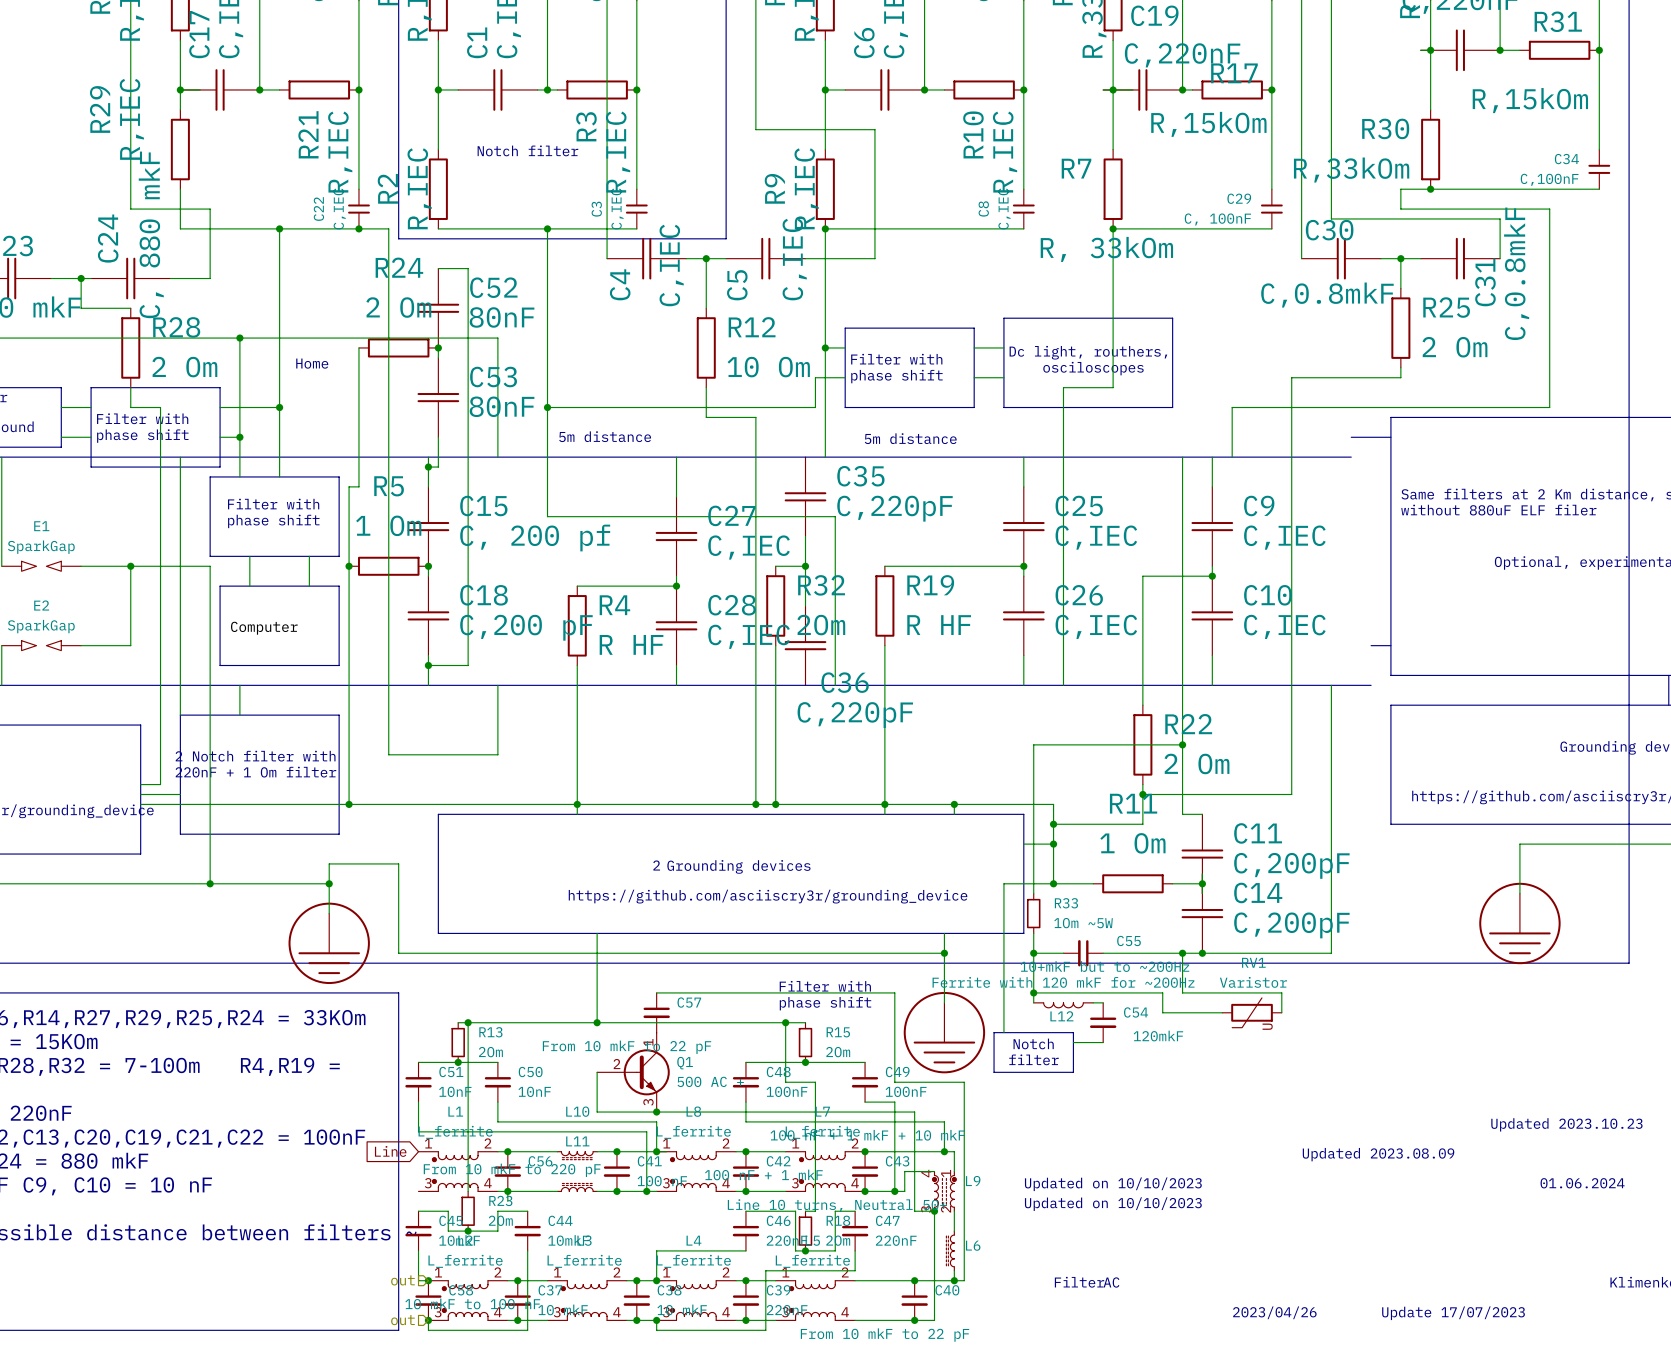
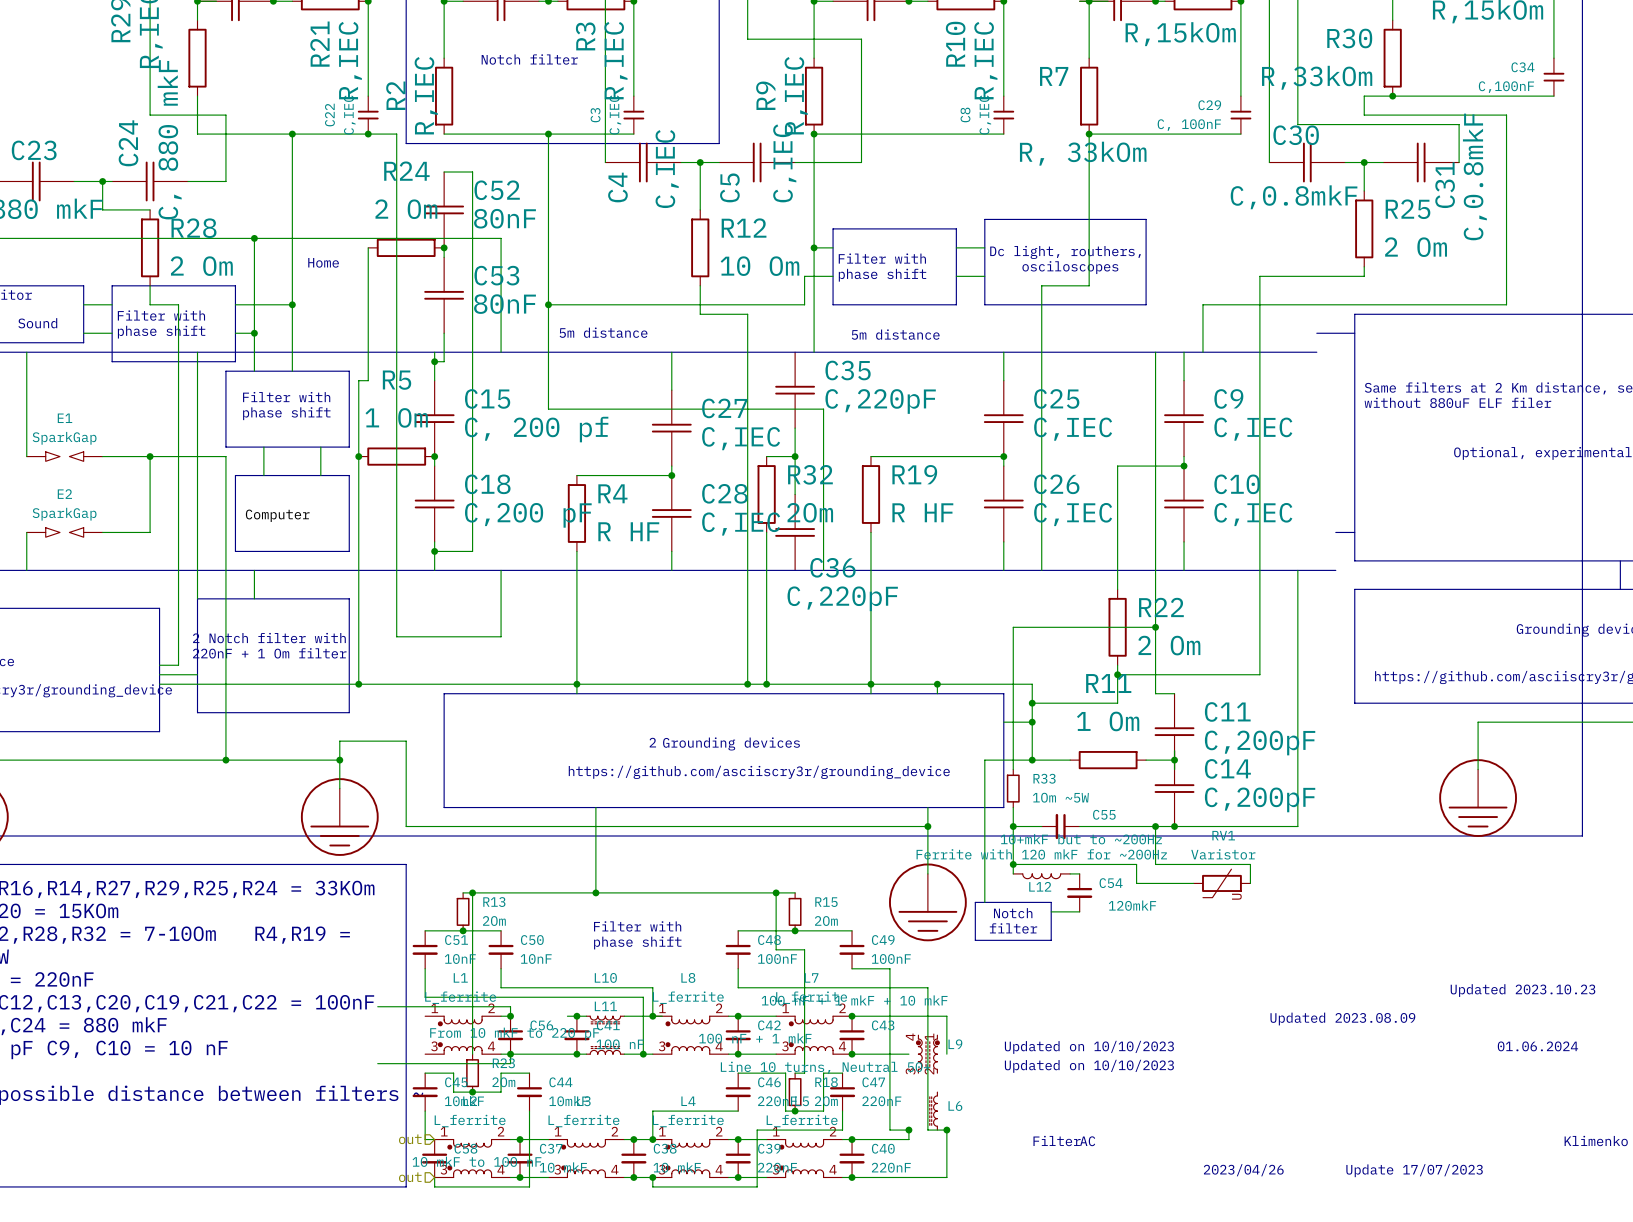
text: Filter with (825, 986) -> none
wire: (656, 992) (894, 992) (894, 1082) (964, 1082) (964, 1151) -> none
text: phase shift (825, 1003) -> none
C57: From 10 mkF to 22 pF (656, 1012) -> none
text: none -> Filter with (637, 926)
wire: (597, 1072) (597, 1112) (914, 1112) (914, 1211) (934, 1211) (934, 1320) -> none
Q1: 500 AC + (633, 1072) -> none
text: none -> phase shift (637, 942)
wire: (894, 1102) (894, 1191) -> (880, 968) (889, 968) (889, 1035)
junction: (656, 1112) -> none
global label: Line (390, 1151) -> none
wire: (507, 1151) (557, 1151) -> (510, 1016) (510, 1006) (377, 1006)
wire: none -> (567, 1016) (586, 1016)
junction: none -> (576, 1016)
wire: (597, 1151) (626, 1151) -> none
junction: (616, 1151) -> none
junction: (944, 1151) -> none
wire: (954, 1151) (954, 1171) -> (937, 1016) (946, 1016)
L10 position: (577, 1155) -> (605, 1020)
C41 position: (616, 1171) -> (576, 1035)
wire: (904, 1171) (934, 1171) -> none
L11 position: (577, 1187) -> (605, 1050)
junction: none -> (576, 1054)
wire: (597, 1191) (626, 1191) -> (557, 1054) (586, 1054)
junction: (616, 1191) -> none
junction: (894, 1191) -> none
wire: none -> (908, 1054) (889, 1054) (889, 1130) (908, 1130) (908, 1139)
wire: (964, 1191) (964, 1270) -> (927, 1016) (927, 1130) (946, 1130)
wire: none -> (377, 1063) (510, 1063)
junction: (934, 1211) -> none
wire: (954, 1211) (954, 1231) -> none
wire: (954, 1270) (954, 1280) -> none
junction: (428, 1280) -> none
junction: none -> (852, 1139)
junction position: (914, 1280) -> (908, 1130)
wire: (924, 1280) (964, 1280) -> (918, 1177) (946, 1177) (946, 1139)
junction position: (954, 1280) -> (946, 1130)
C40 position: (914, 1300) -> (852, 1158)
junction: (428, 1320) -> none
junction: none -> (852, 1177)
junction: (914, 1320) -> none
C40 value: From 10 mkF to 22 pF (884, 1335) -> 220nF (891, 1167)

